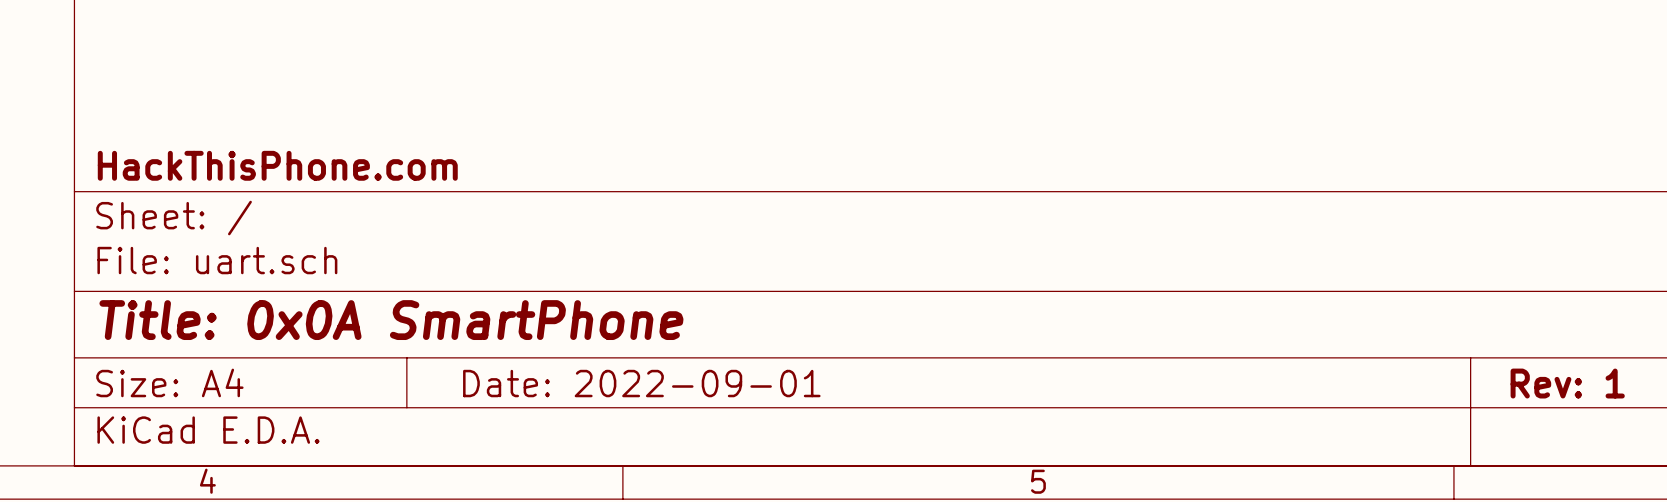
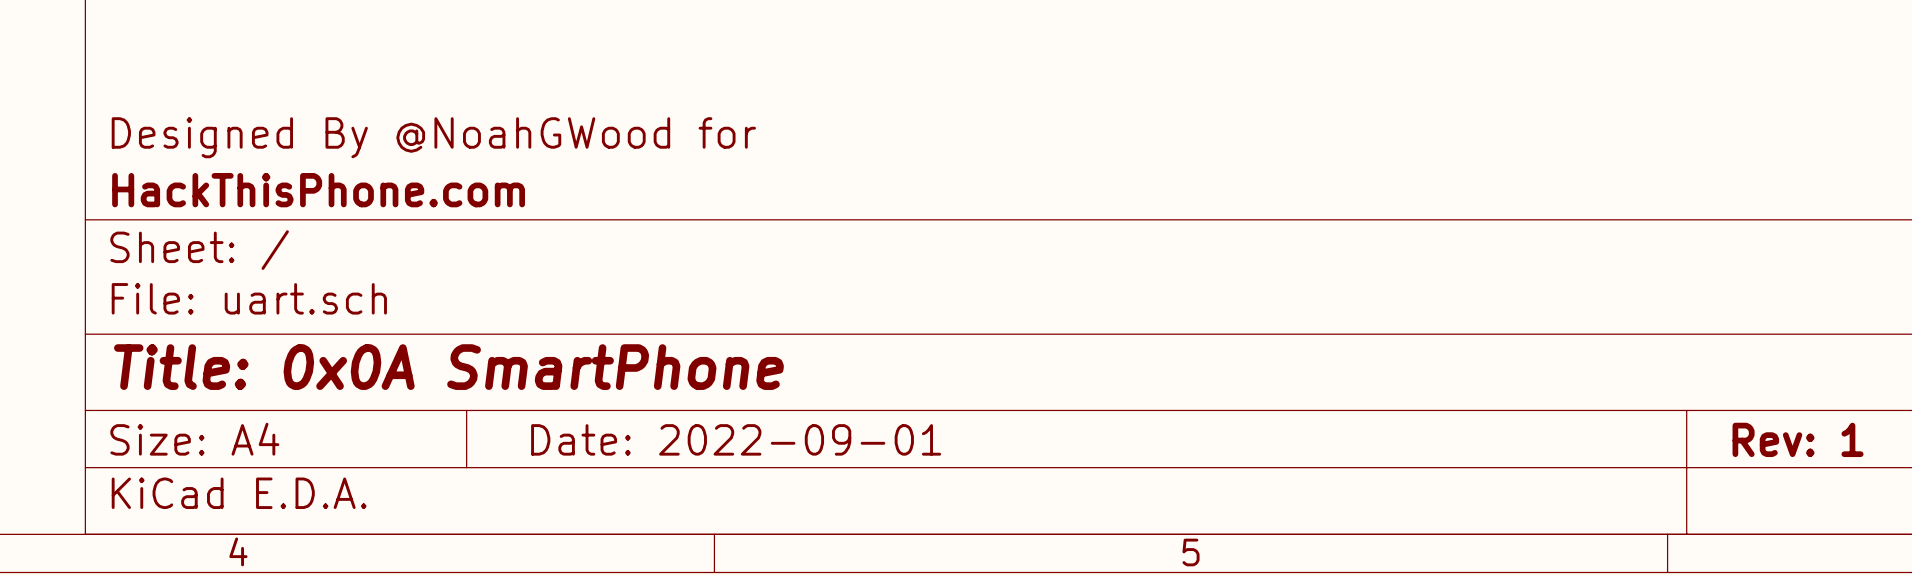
title block: none -> Designed By @NoahGWood for (433, 137)

